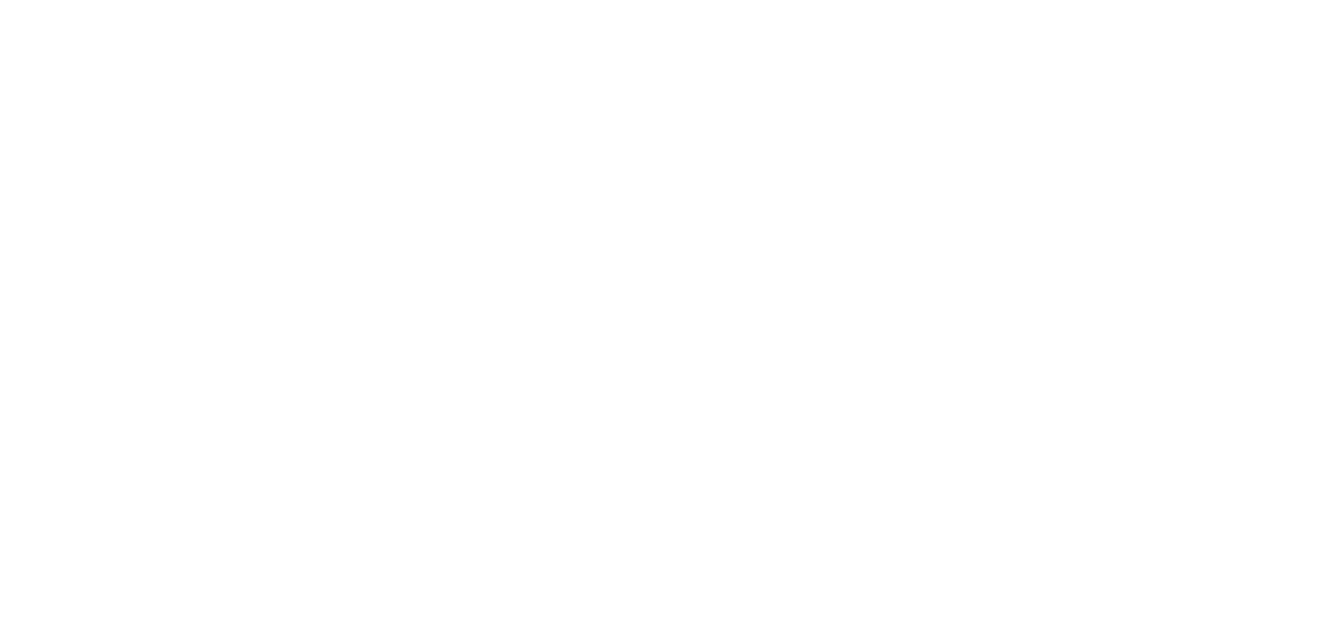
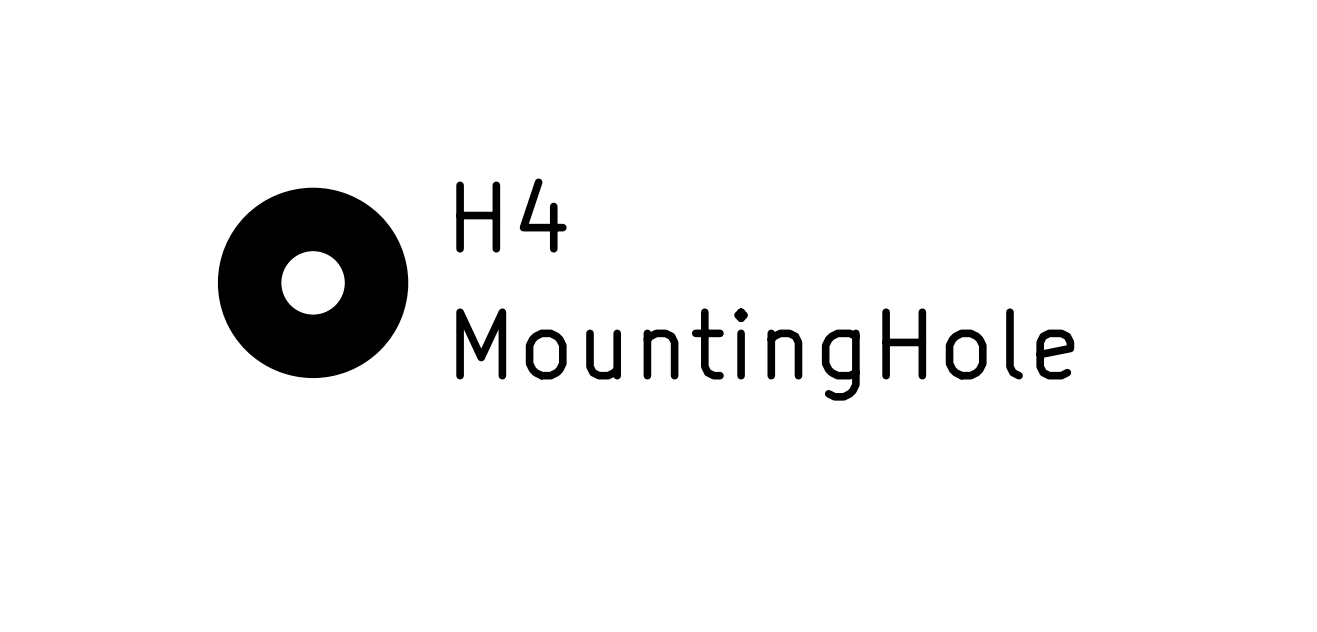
H4: none -> MountingHole (313, 282)

